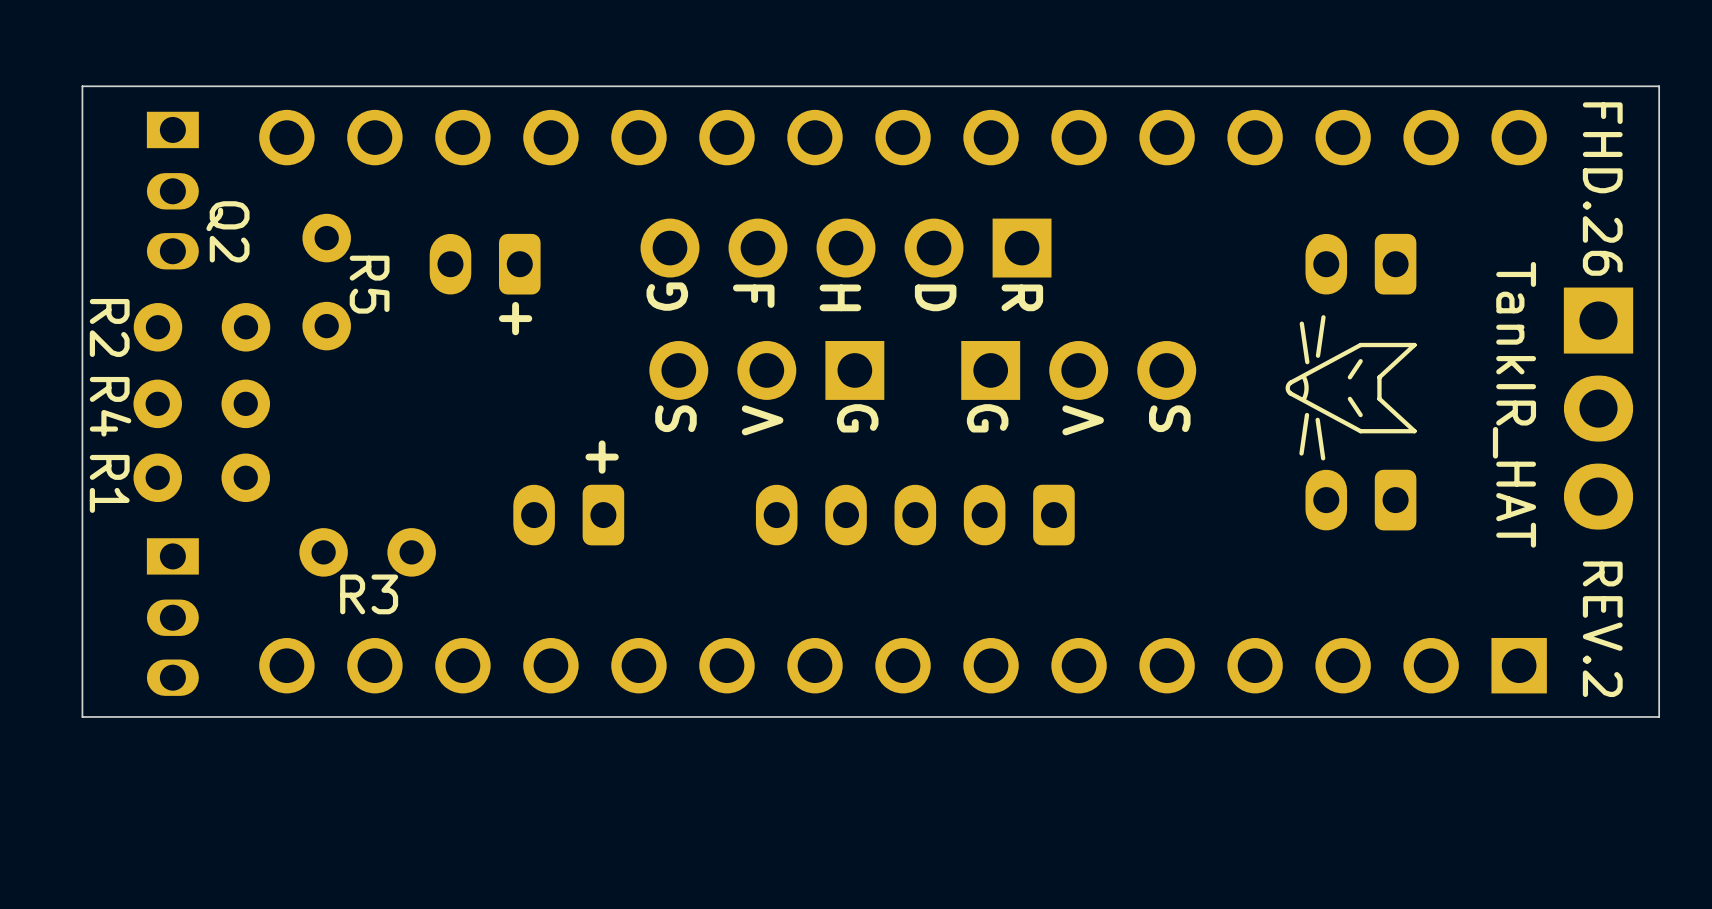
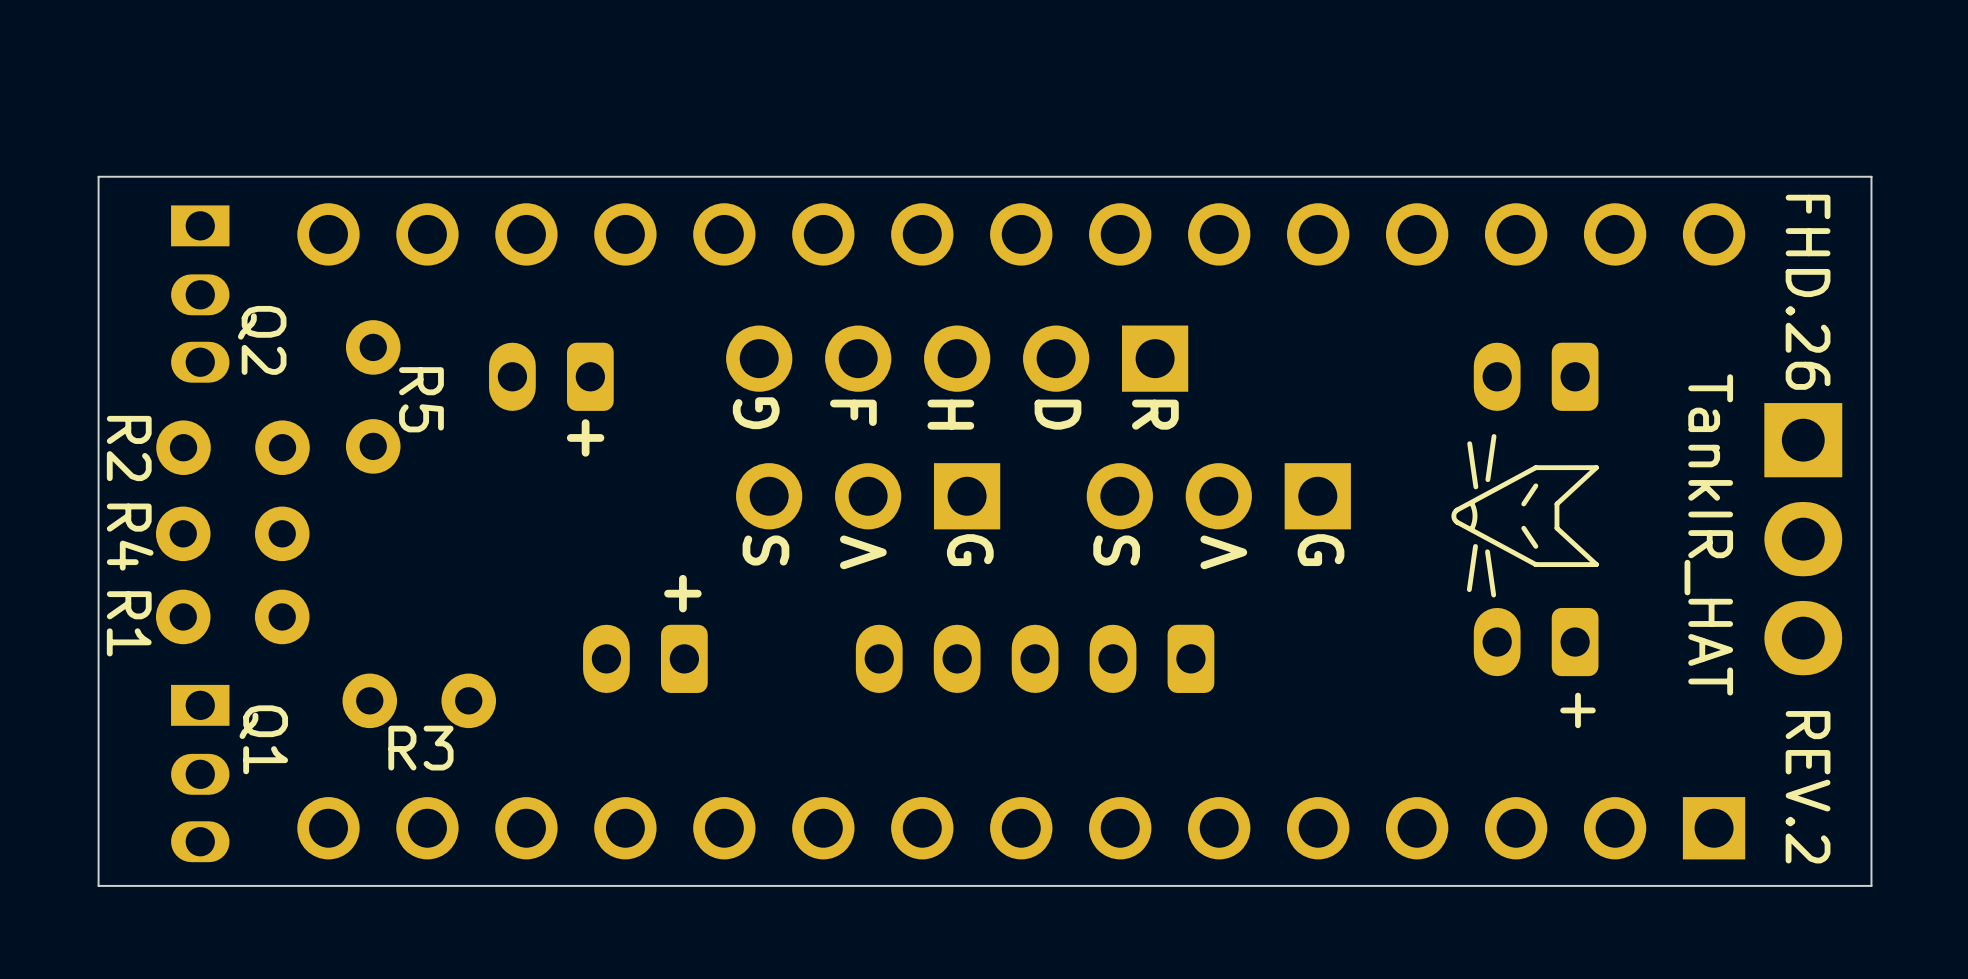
part rotation: 0° (1078, 370) -> 180° (1218, 496)
text position: G (987, 418) -> G (1321, 550)
text position: S (1169, 418) -> S (1116, 550)
text: none -> + (1577, 710)
Q1 name: none -> Q1 (263, 739)

